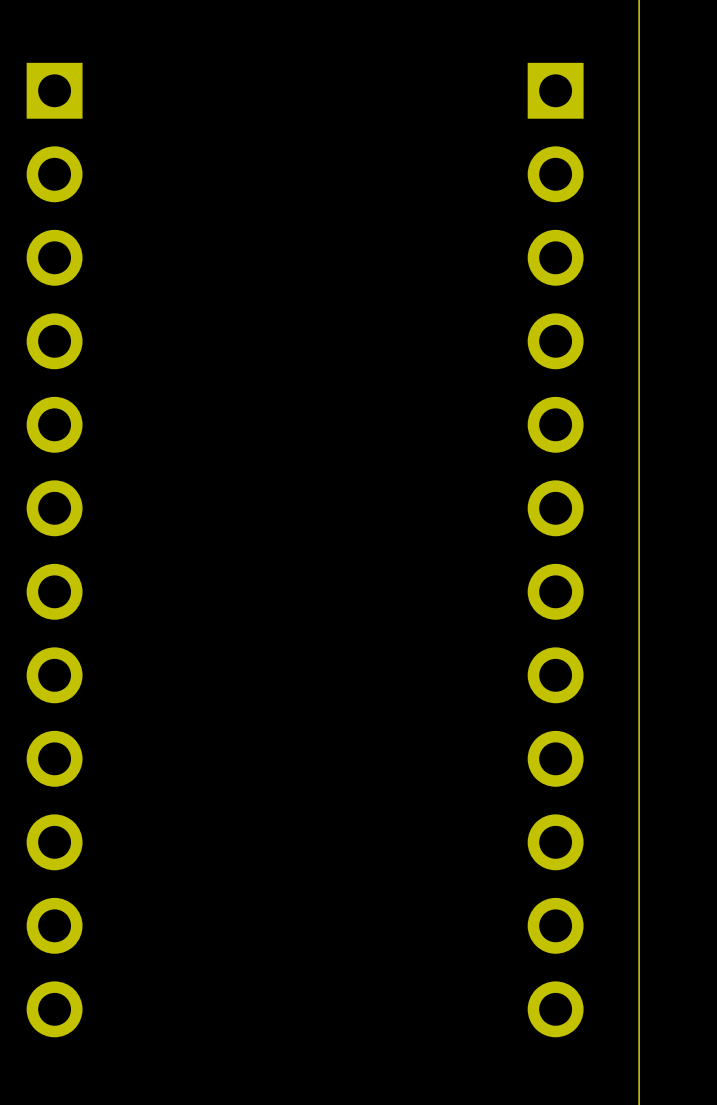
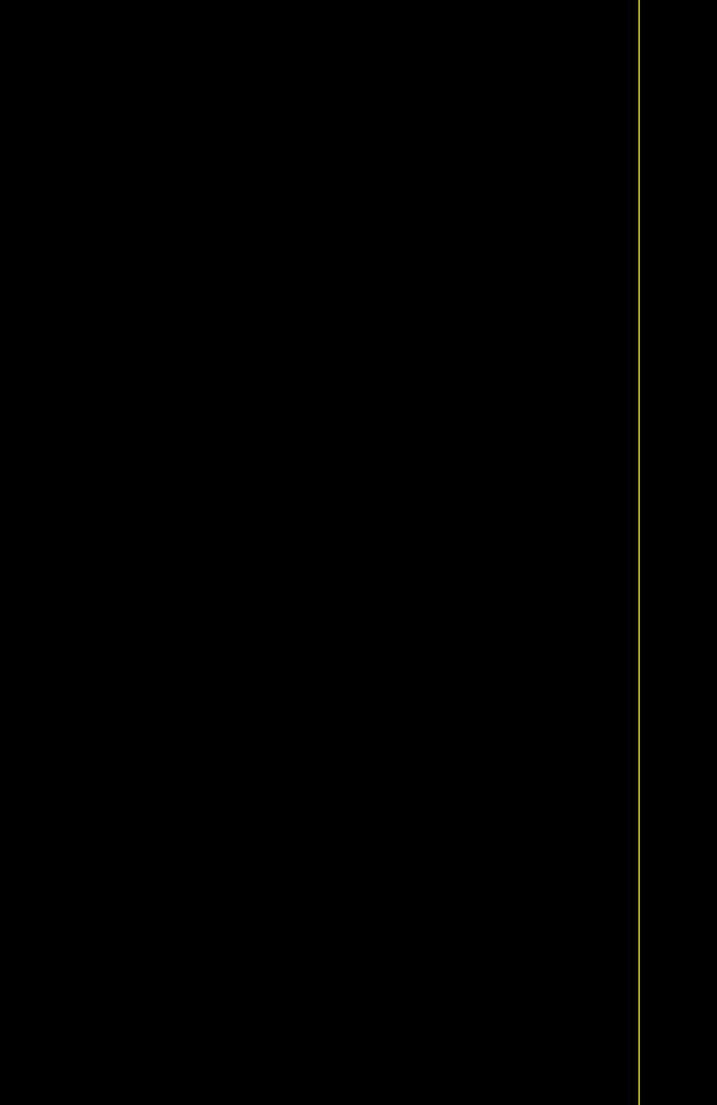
part: (54, 550) -> none
part: (555, 550) -> none

